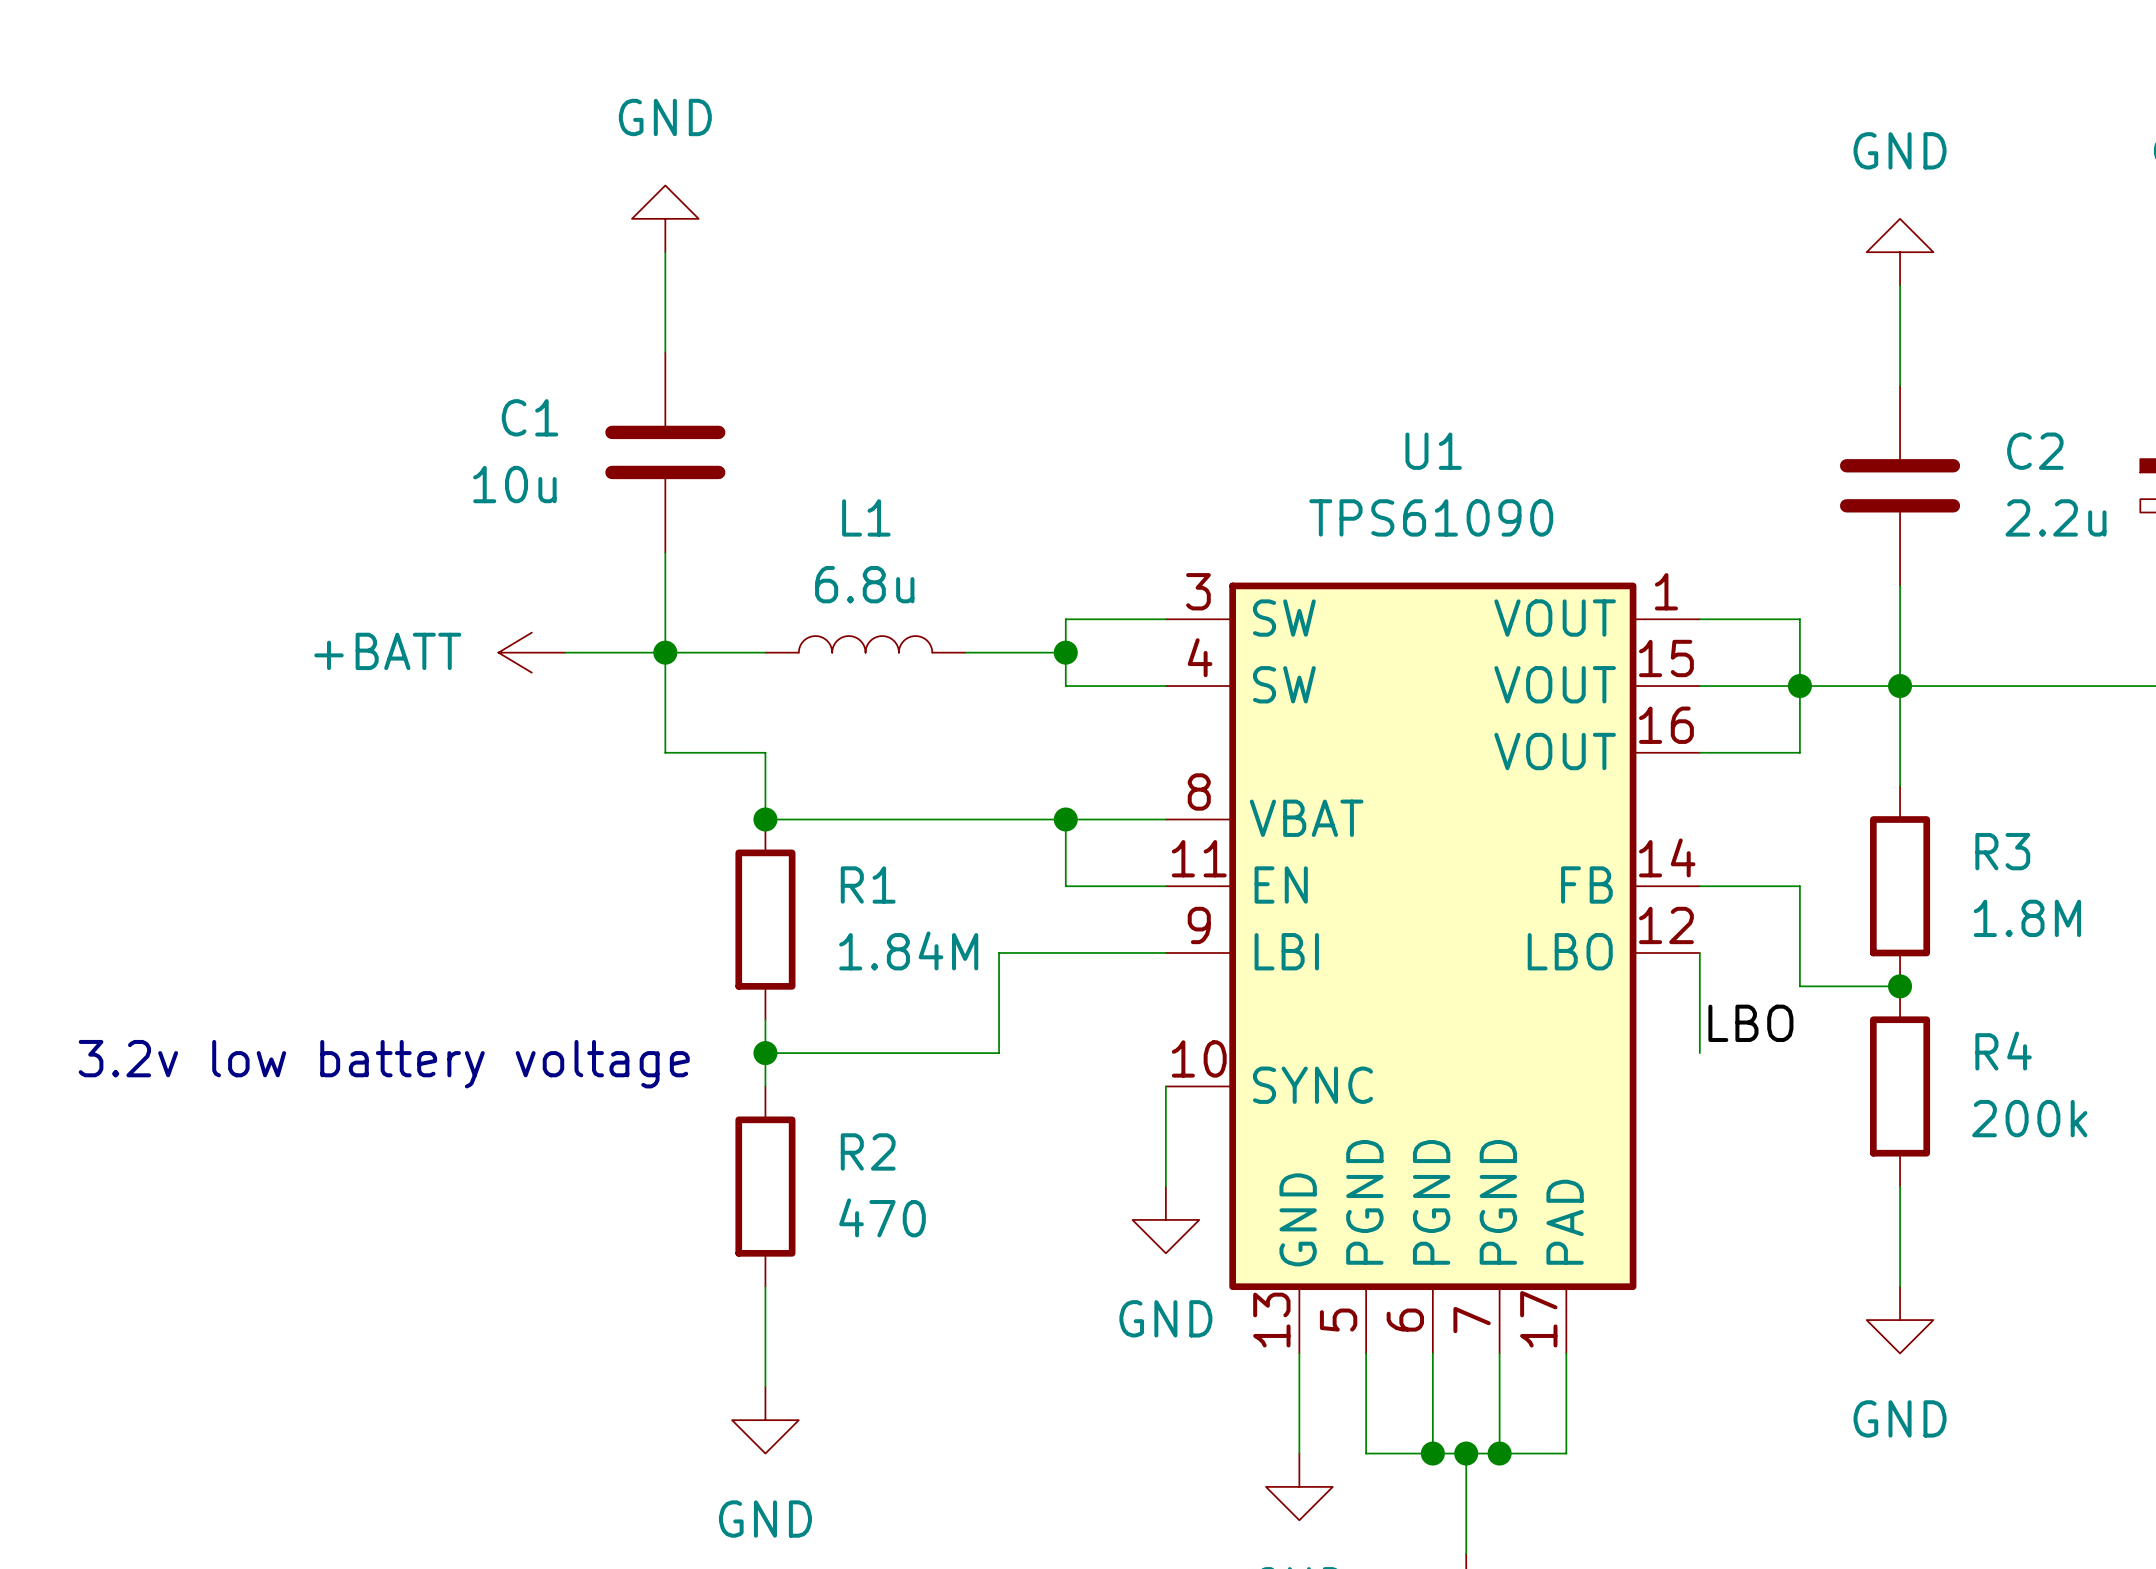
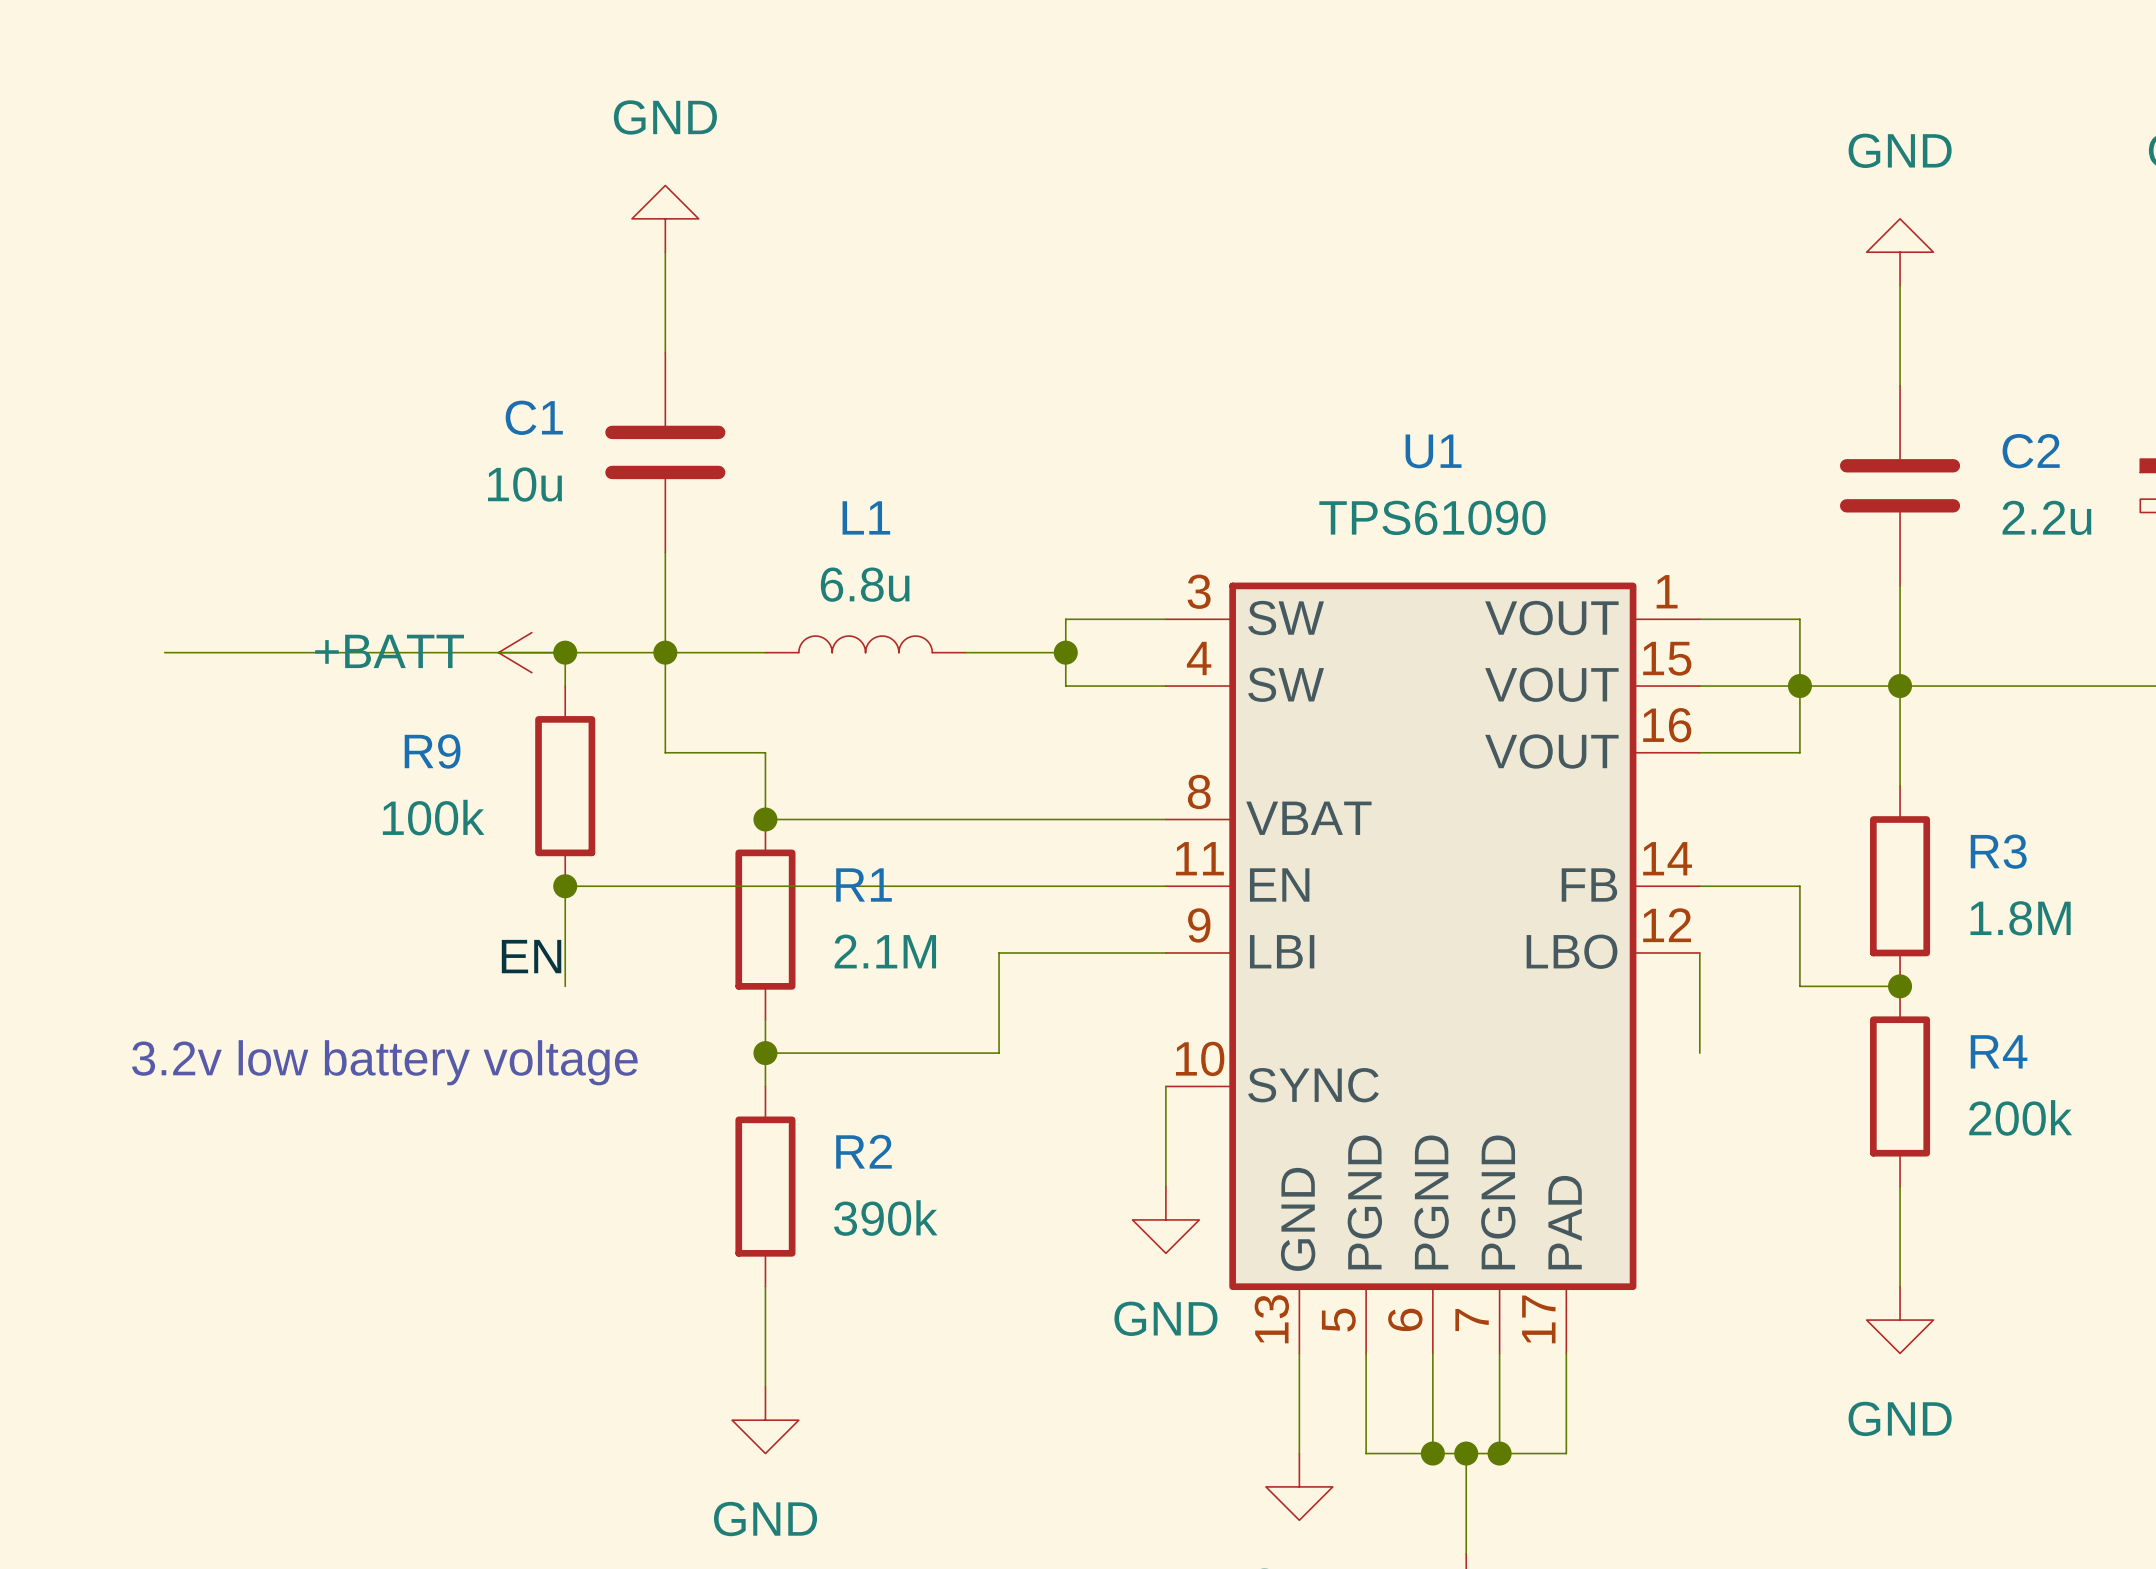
wire: none -> (164, 652) (565, 652) (565, 686)
junction: none -> (565, 652)
R9: none -> 100k (565, 786)
wire: (1065, 819) (1065, 886) -> (565, 986) (565, 886) (1065, 886)
junction: (1065, 819) -> none
junction: none -> (565, 886)
R1 value: 1.84M (908, 950) -> 2.1M (885, 951)
label: none -> EN (531, 956)
label: LBO (1750, 1023) -> none
R2 value: 470 (882, 1217) -> 390k (885, 1218)

